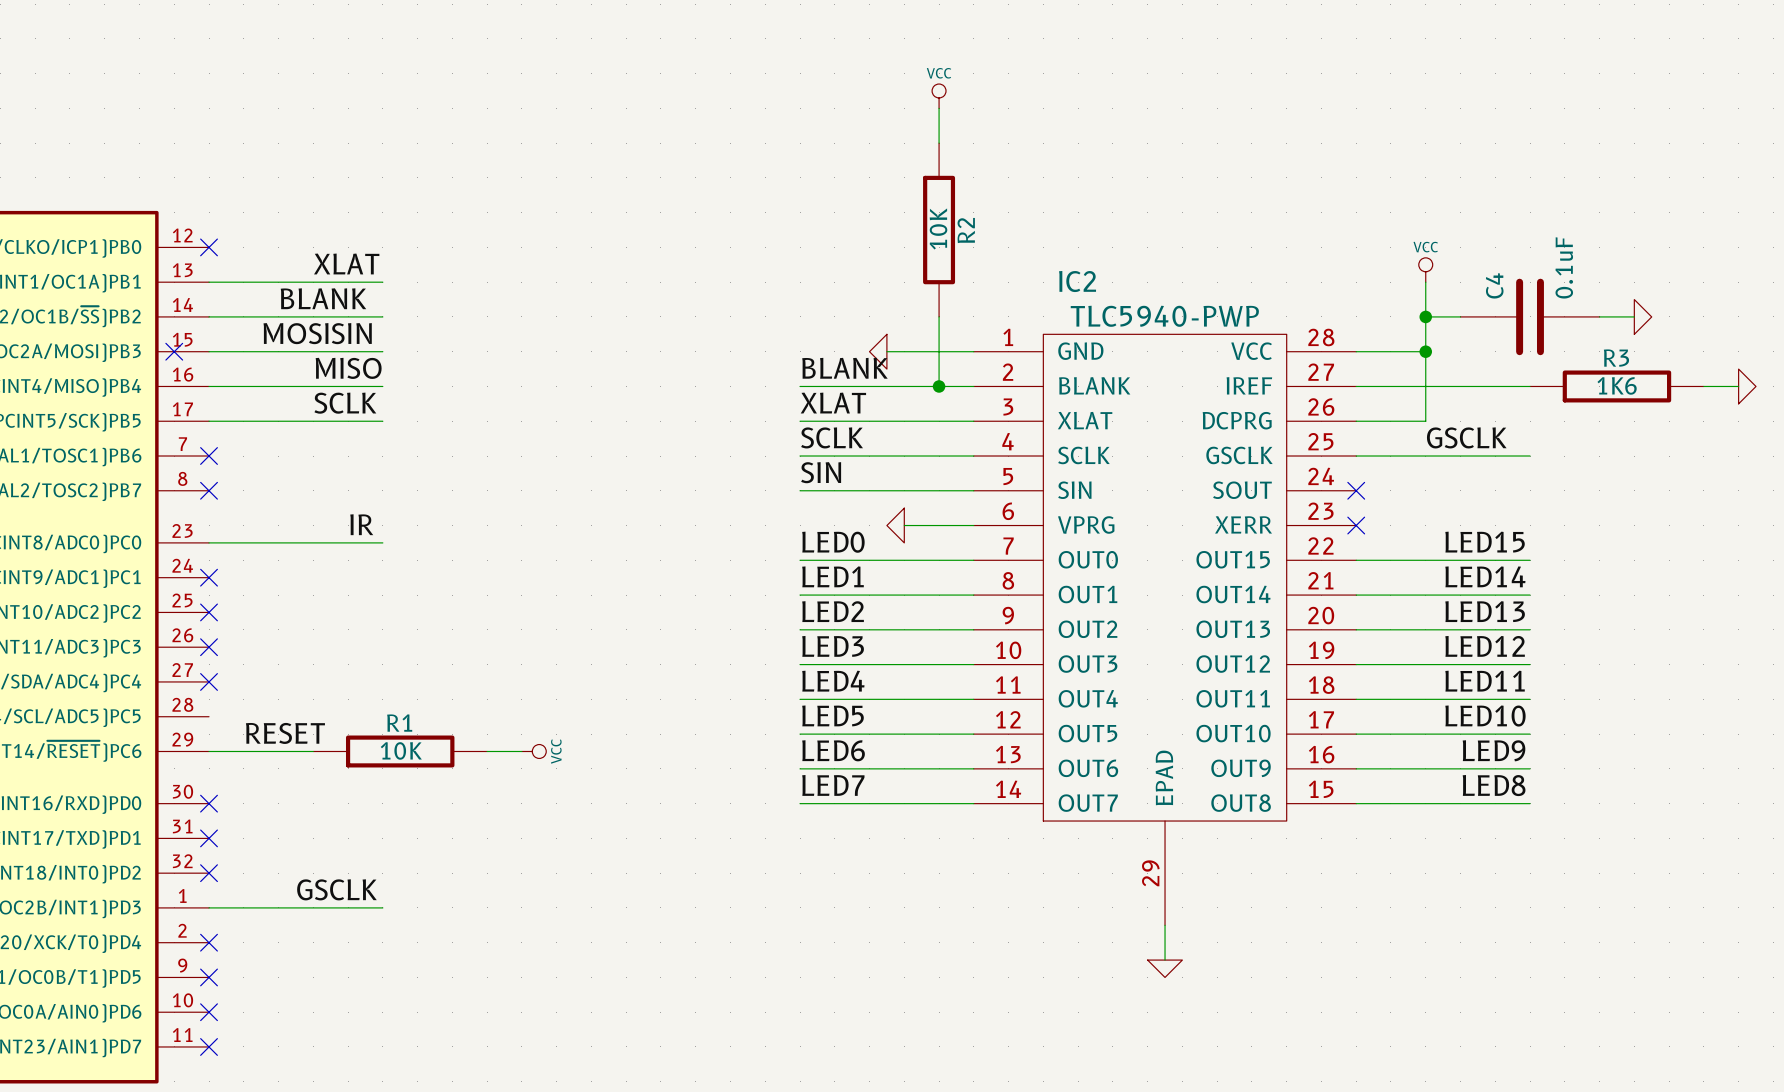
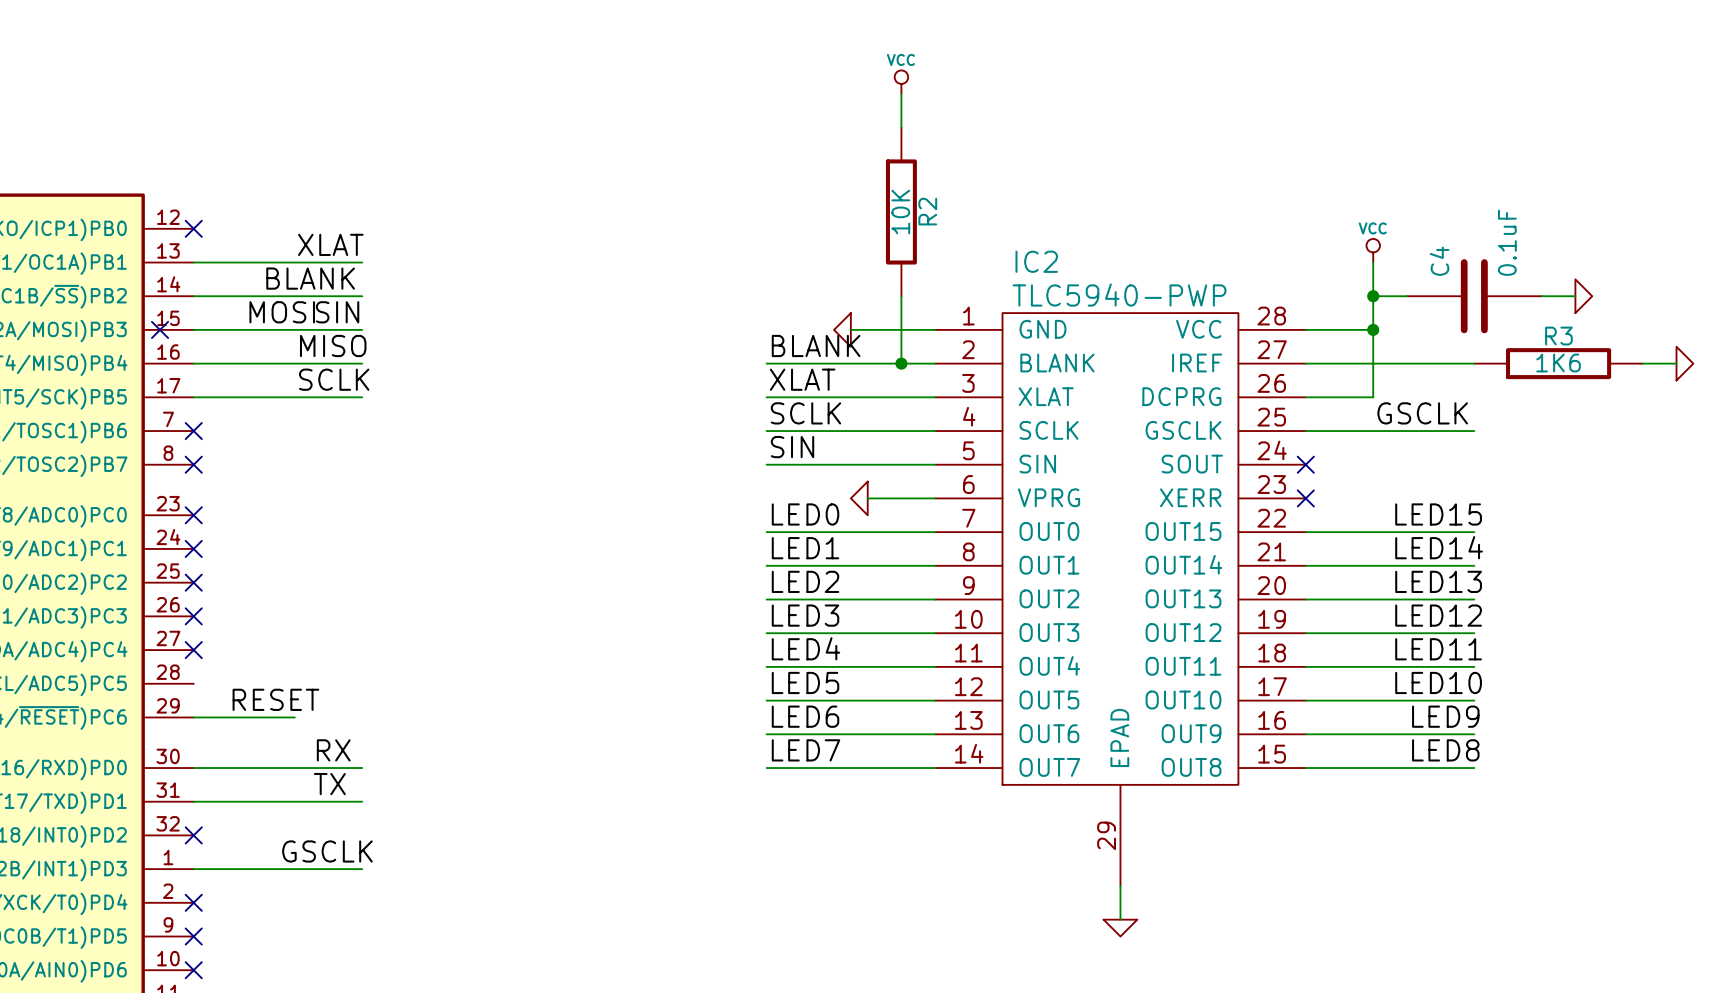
label: IR (361, 524) -> none
wire: (209, 542) (382, 542) -> (193, 768) (362, 768)
no-connect mark: none -> (193, 515)
R1: 10K (400, 751) -> none
wire: (487, 751) (521, 751) -> none
power symbol: VCC (534, 751) -> none
label: none -> RX (333, 750)
no-connect mark: (209, 803) -> none
label: none -> TX (329, 784)
wire: none -> (193, 801) (362, 801)
no-connect mark: (209, 838) -> none

